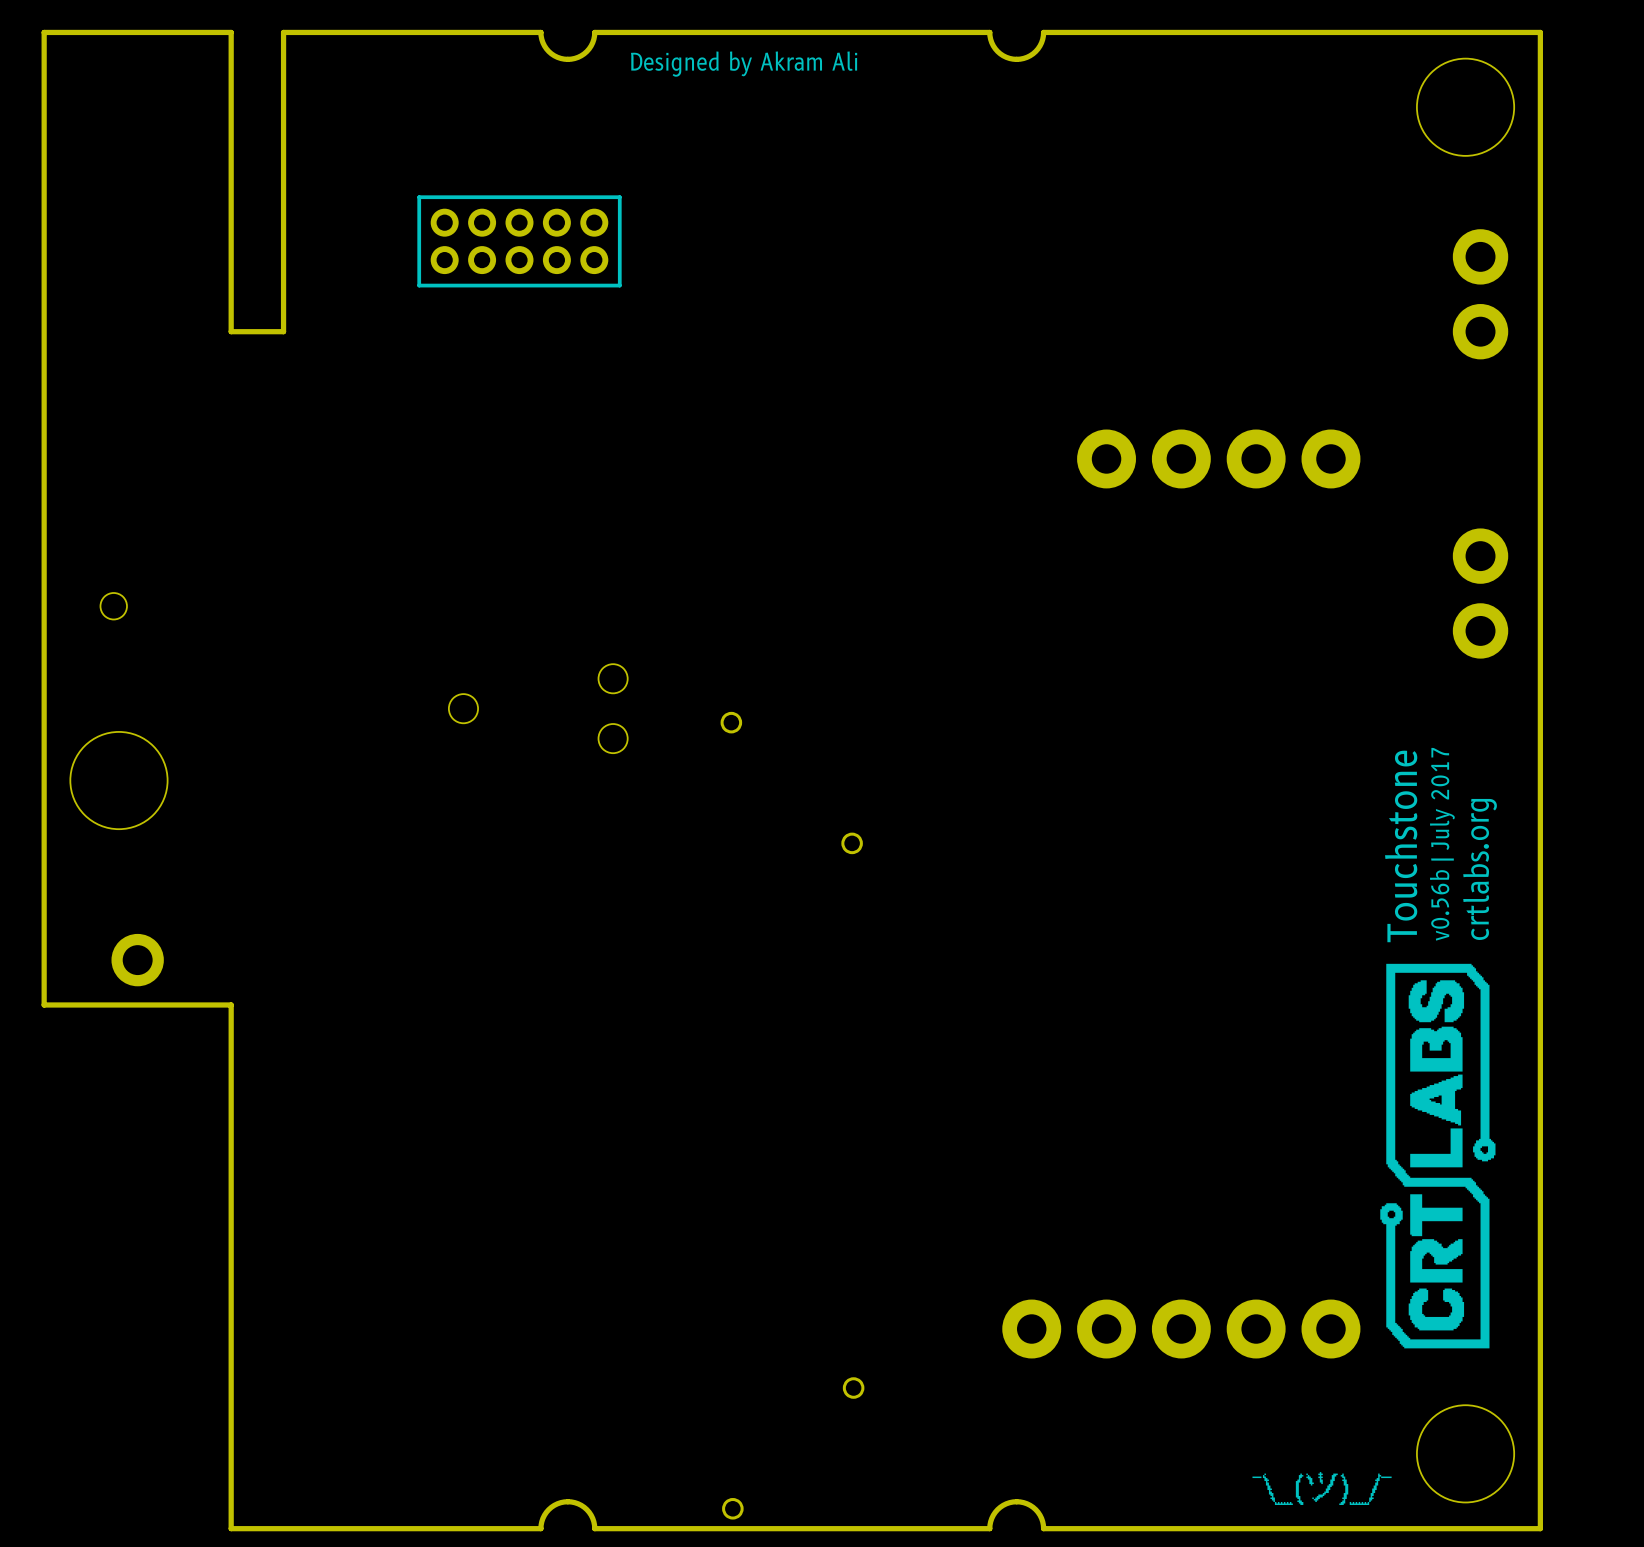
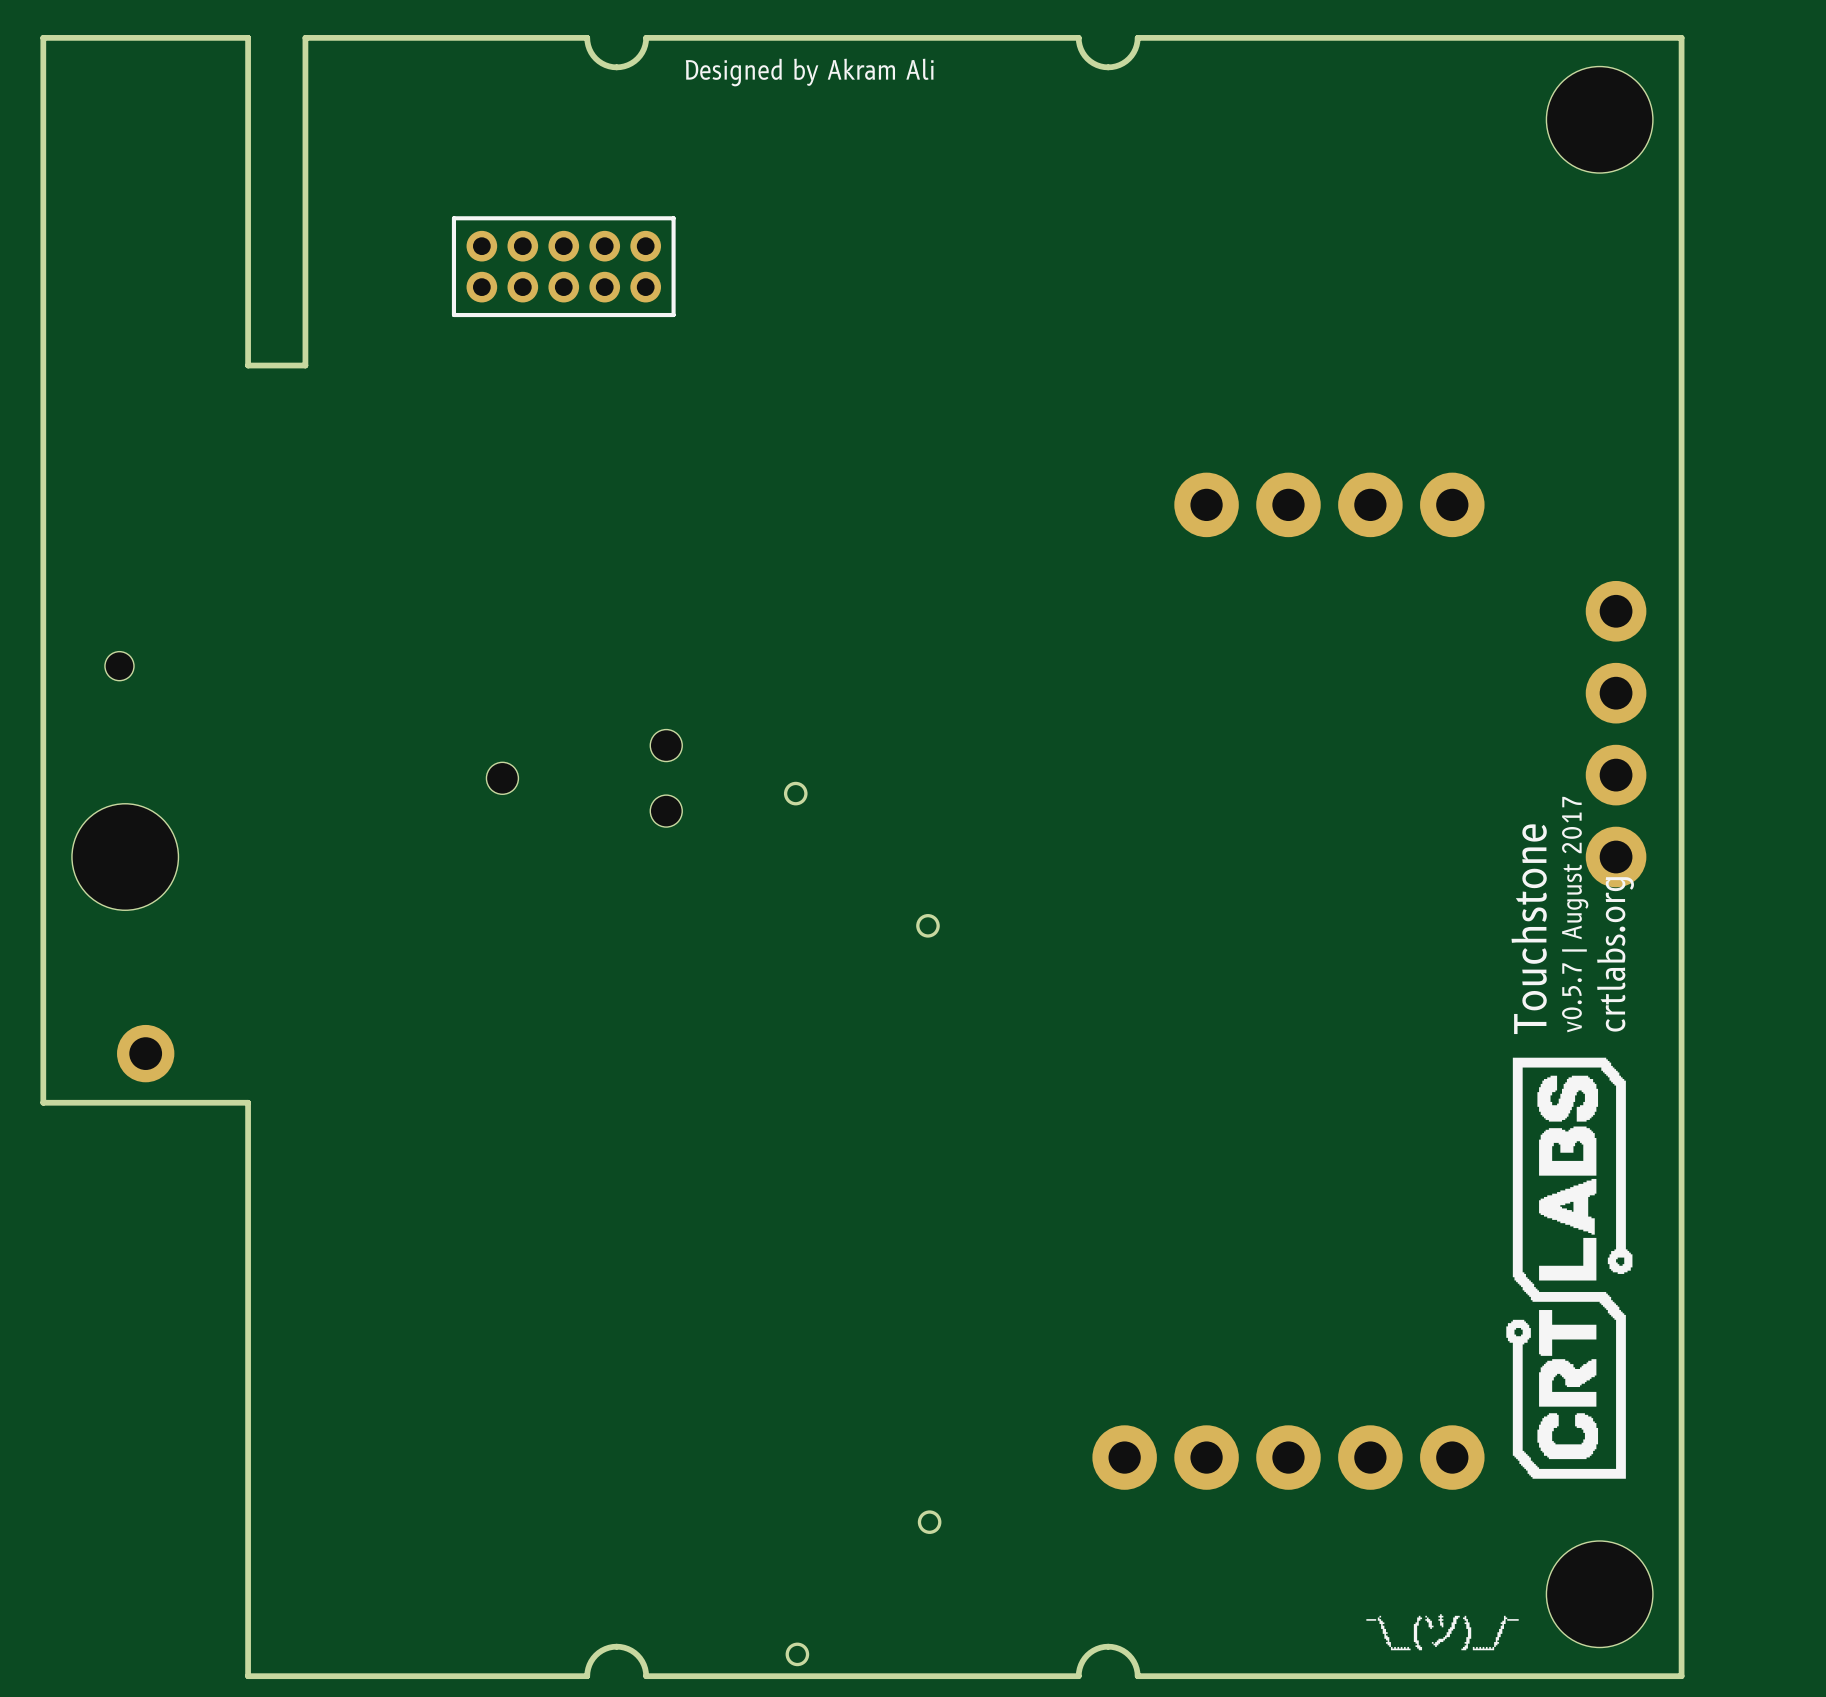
part position: (1480, 294) -> (1616, 816)
text: v0.56b | July 2017 (1442, 844) -> v0.5.7 | August 2017 (1575, 914)

